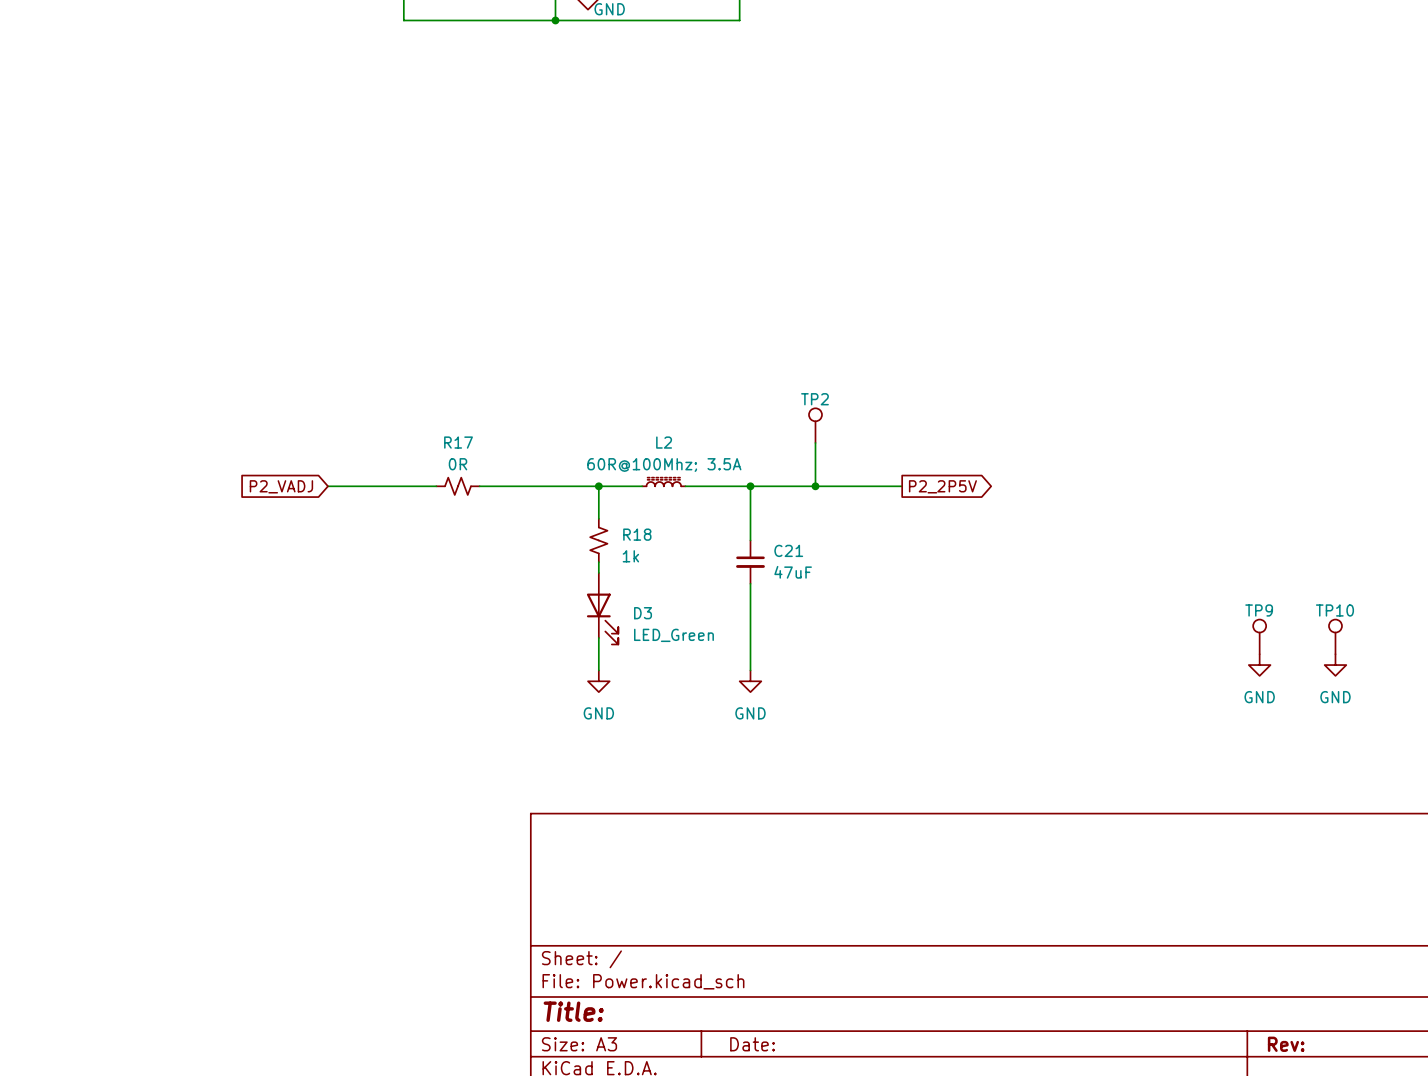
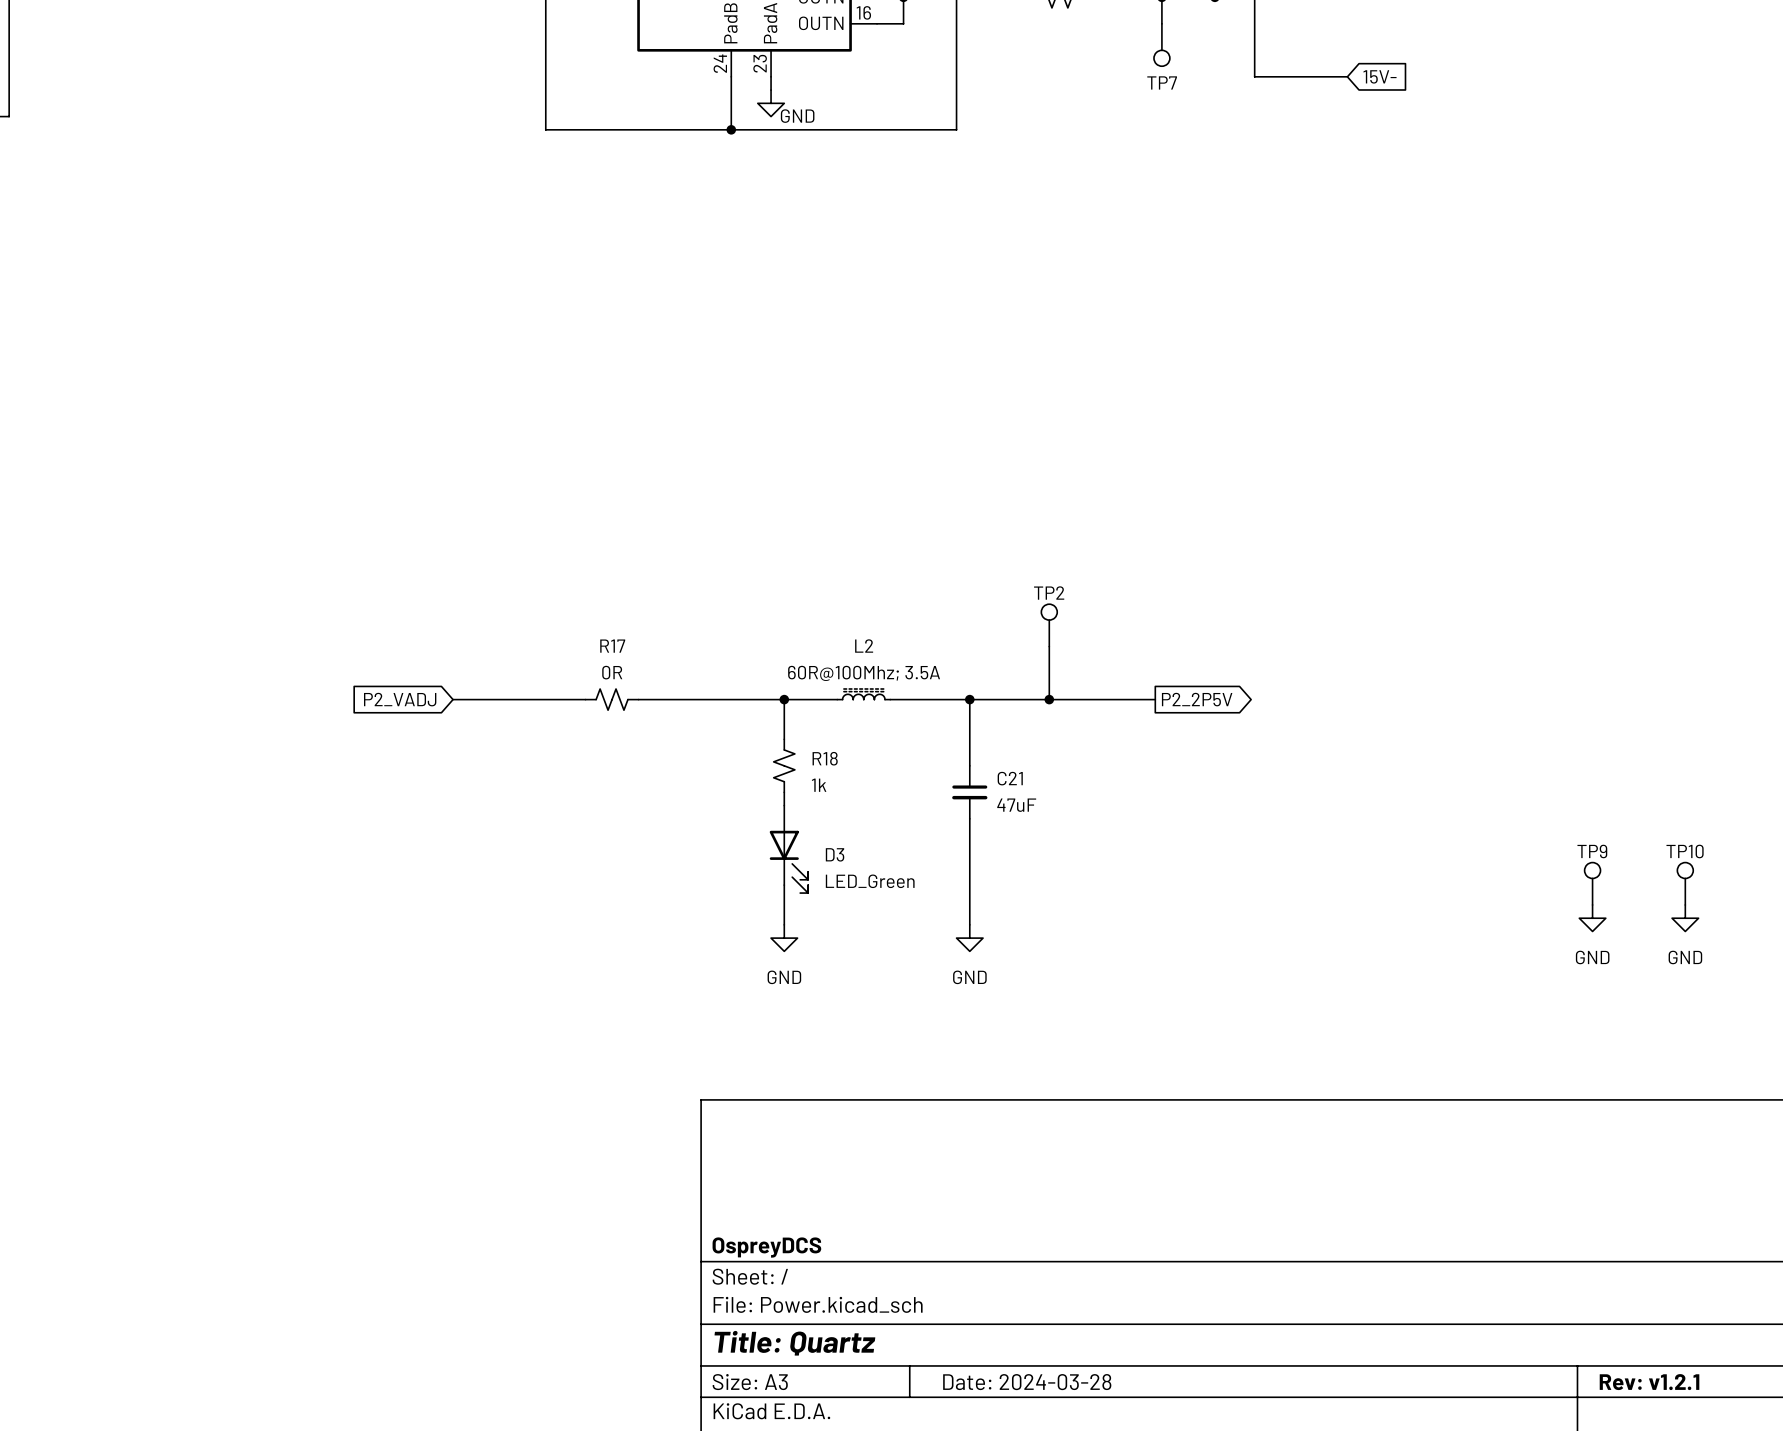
title block: none -> OspreyDCS (766, 1247)
title block: Title: (573, 1011) -> Title: Quartz (794, 1343)
title block: Date: (752, 1044) -> Date: 2024-03-28 (1027, 1382)
title block: Rev: (1286, 1044) -> Rev: v1.2.1 (1649, 1382)

